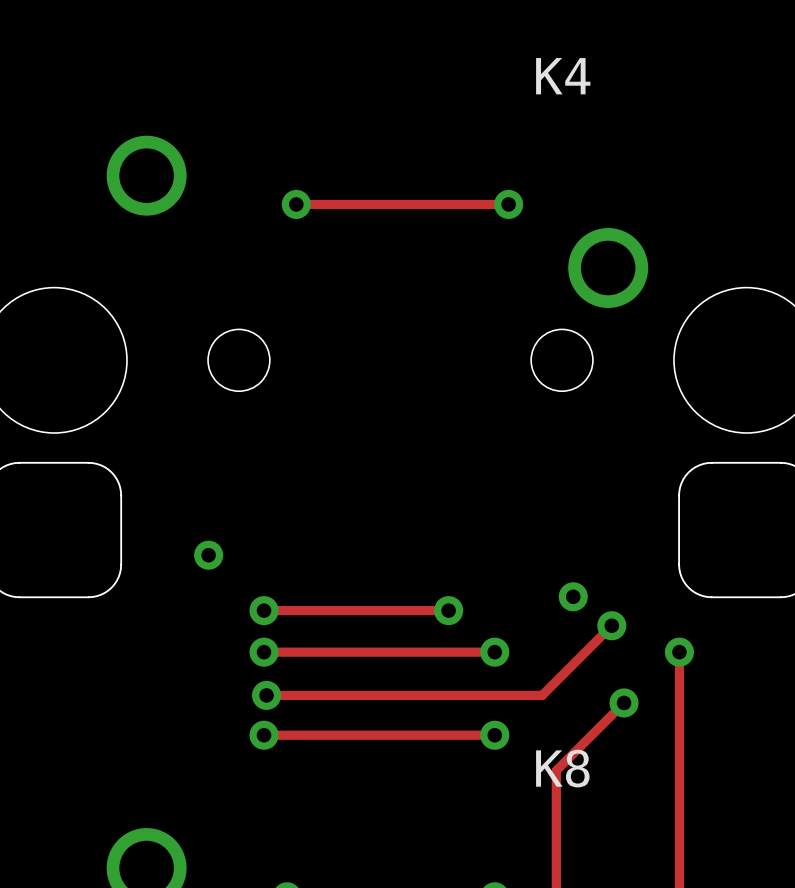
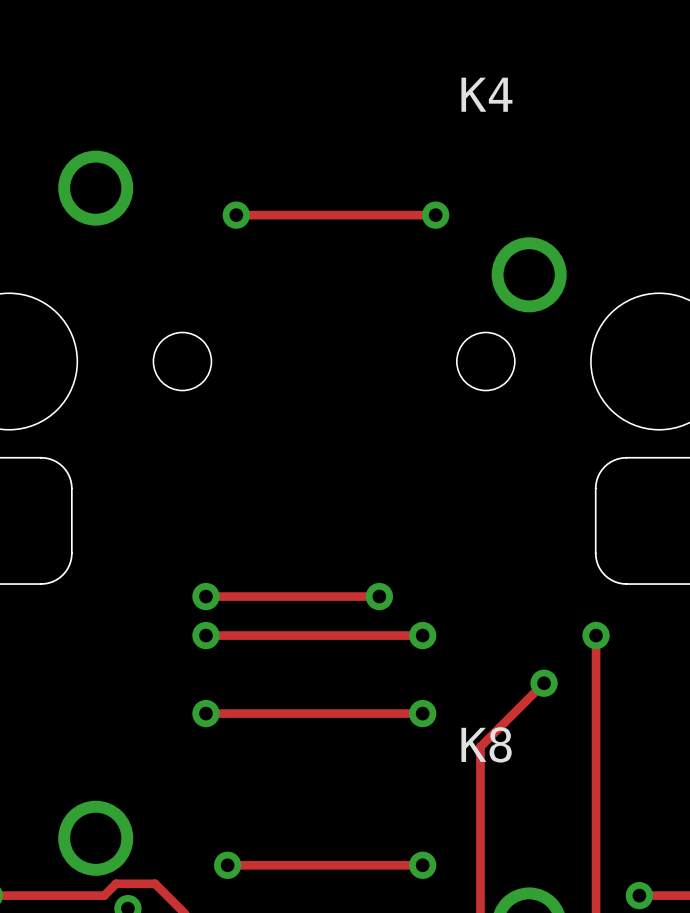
via: (208, 555) -> none
via: (573, 596) -> none
track: (611, 625) (542, 695) (266, 695) -> none
via: (611, 625) -> none
via: (266, 695) -> none

